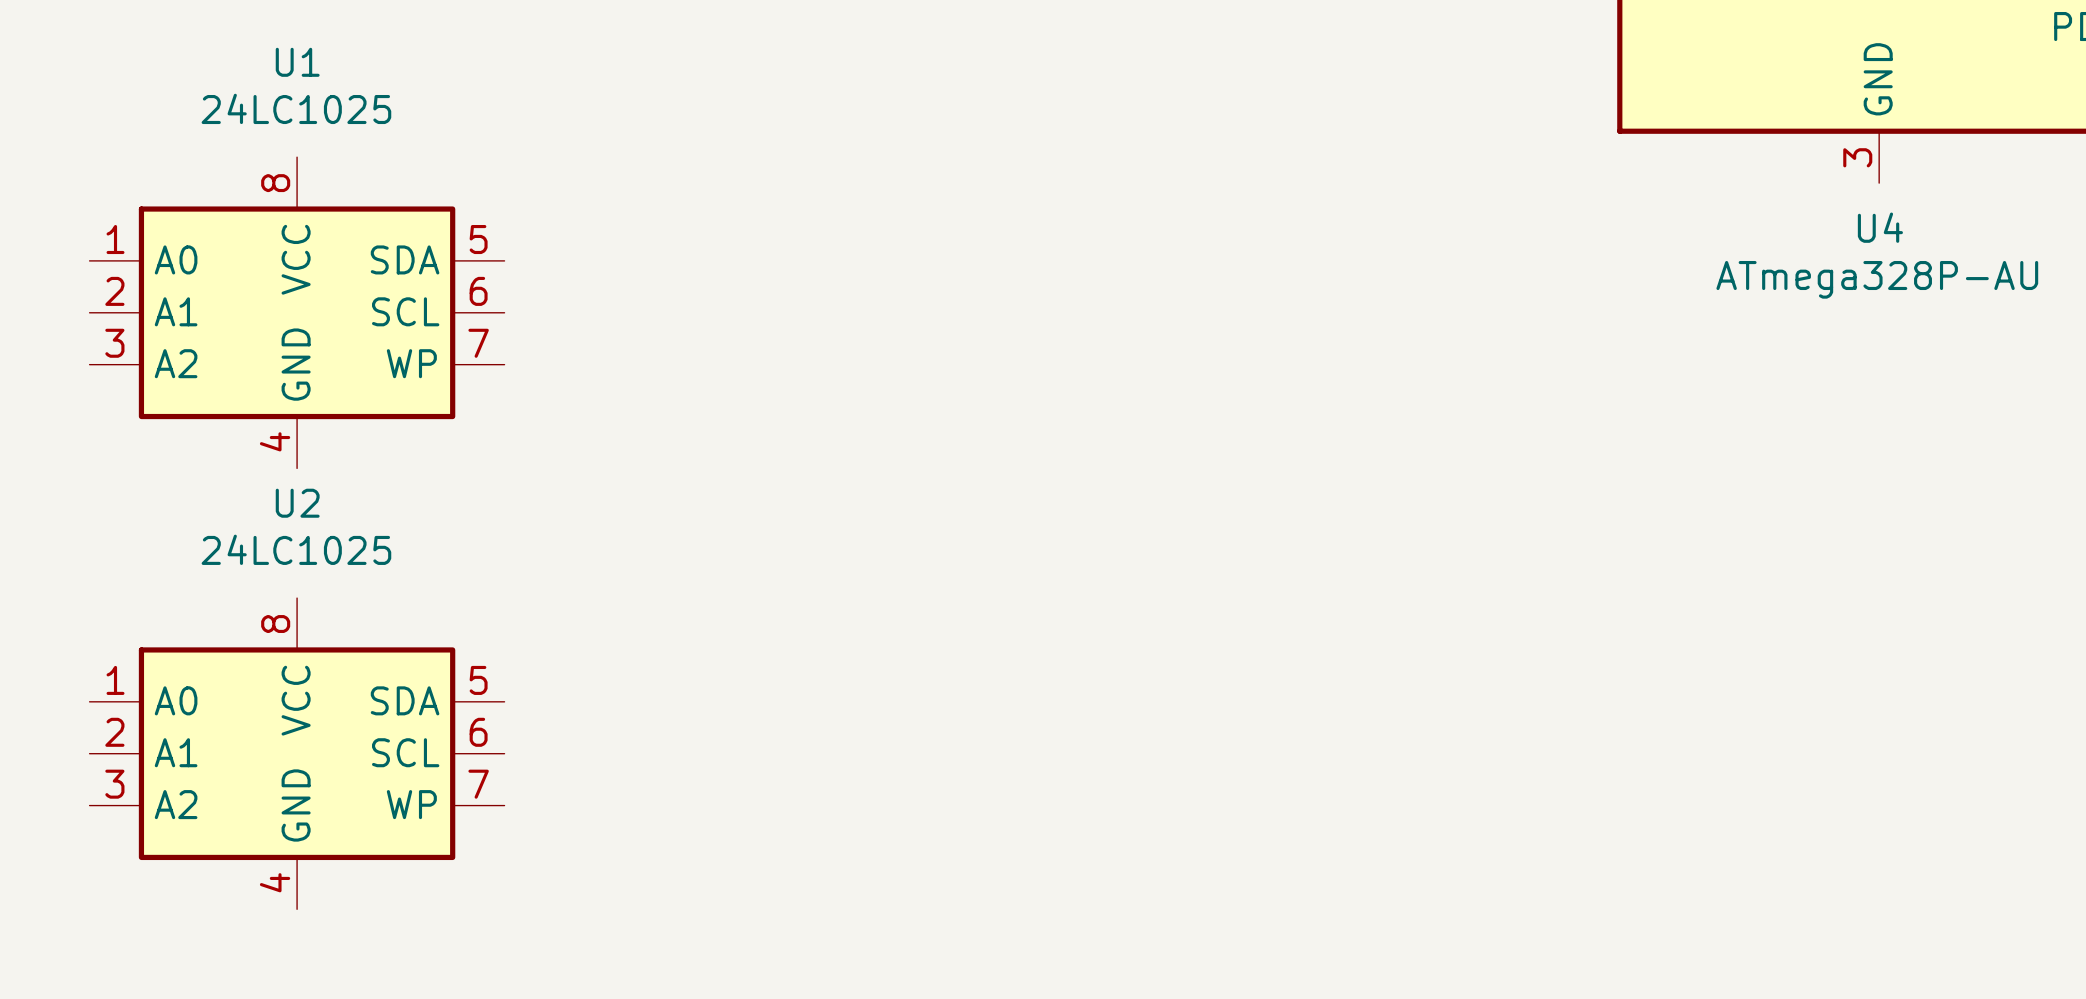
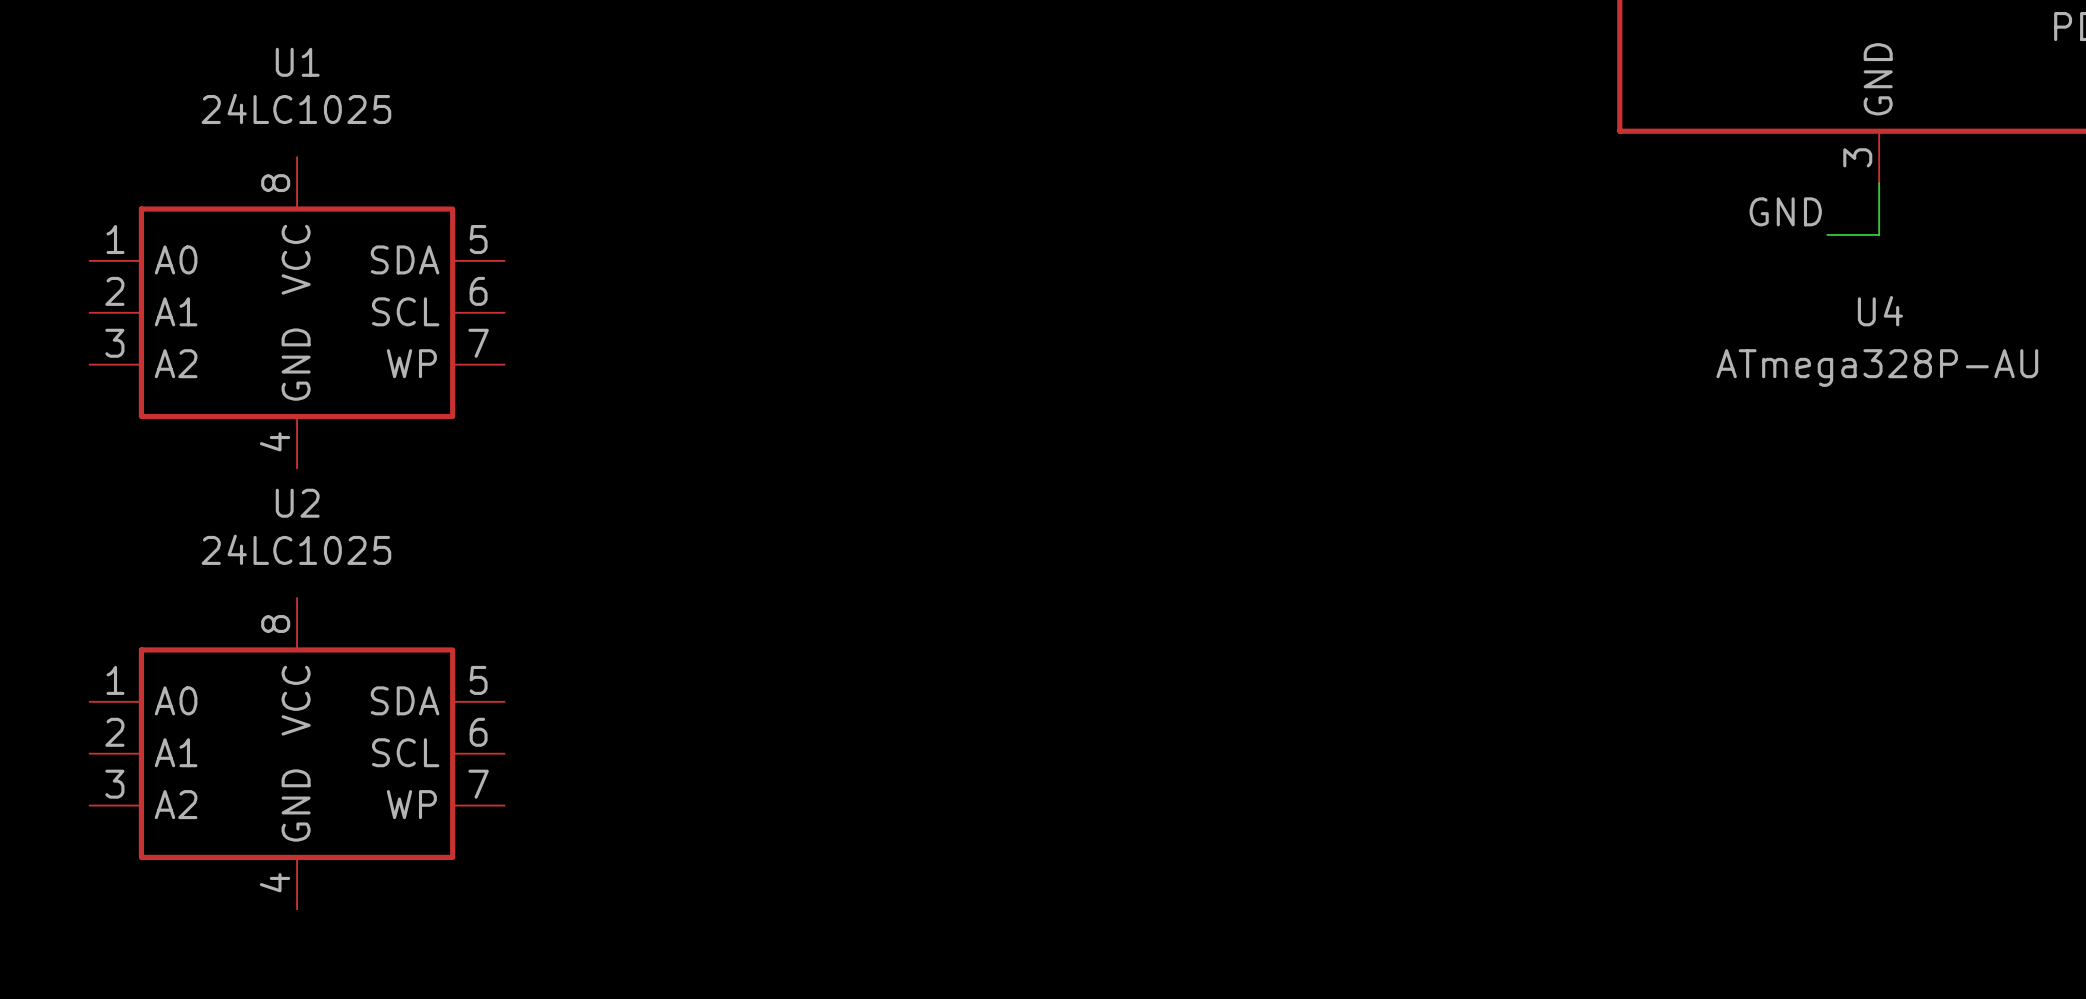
wire: none -> (1879, 183) (1879, 234) (1827, 234)
label: none -> GND (1785, 211)
U4 name position: U4 (1880, 227) -> U4 (1880, 311)
U4 value position: ATmega328P-AU (1877, 279) -> ATmega328P-AU (1877, 368)

